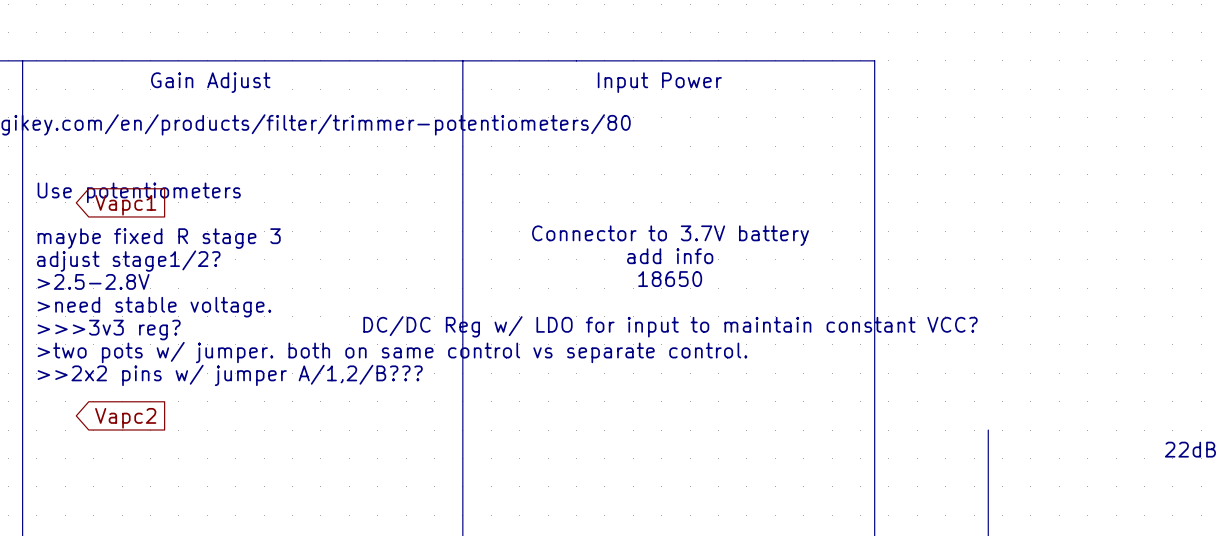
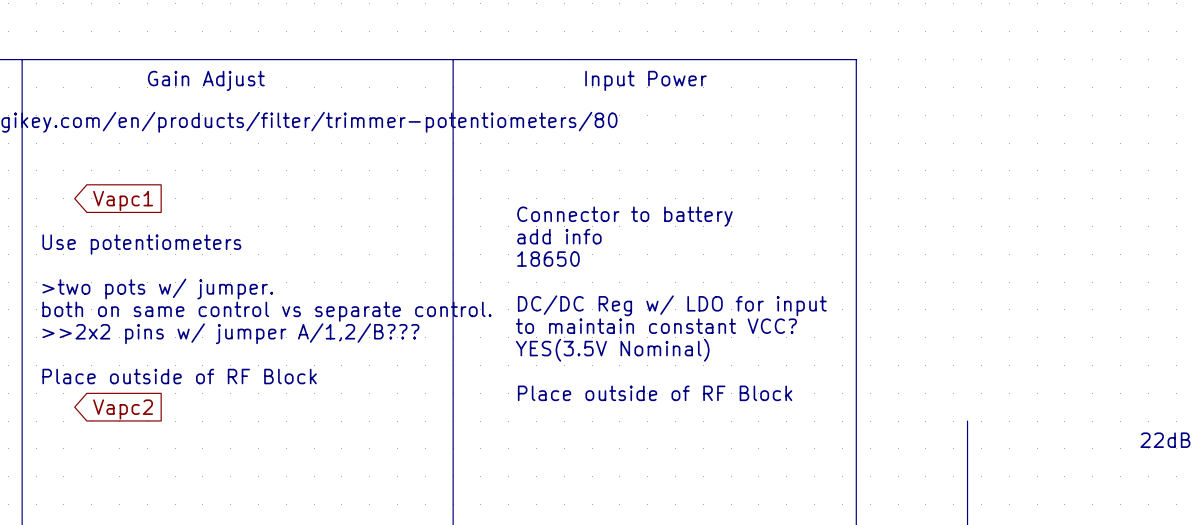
text position: Use potentiometers (139, 192) -> Use potentiometers (141, 244)
text: Connector to 3.7V battery (670, 235) -> Connector to battery (624, 216)
text: maybe fixed R stage 3 (159, 238) -> none
text position: add info (670, 256) -> add info (559, 236)
text: adjust stage1/2? (128, 261) -> none
text position: 18650 (670, 279) -> 18650 (548, 259)
text: >2.5-2.8V (93, 281) -> none
text: none -> >two pots w/ jumper. (157, 288)
text: >need stable voltage. (154, 307) -> none
text: none -> DC/DC Reg w/ LDO for input (672, 305)
text: none -> both on same control vs separate control. (267, 311)
text: DC/DC Reg w/ LDO for input to maintain constant VCC? (670, 326) -> none
text: >>>3v3 reg? (109, 330) -> none
text: none -> to maintain constant VCC? (656, 326)
text: >two pots w/ jumper. both on same control vs separate control. (392, 352) -> none
text: none -> YES(3.5V Nominal) (612, 350)
text position: >>2x2 pins w/ jumper A/1,2/B??? (230, 375) -> >>2x2 pins w/ jumper A/1,2/B??? (230, 333)
text: none -> Place outside of RF Block (179, 376)
text: none -> Place outside of RF Block (655, 393)

